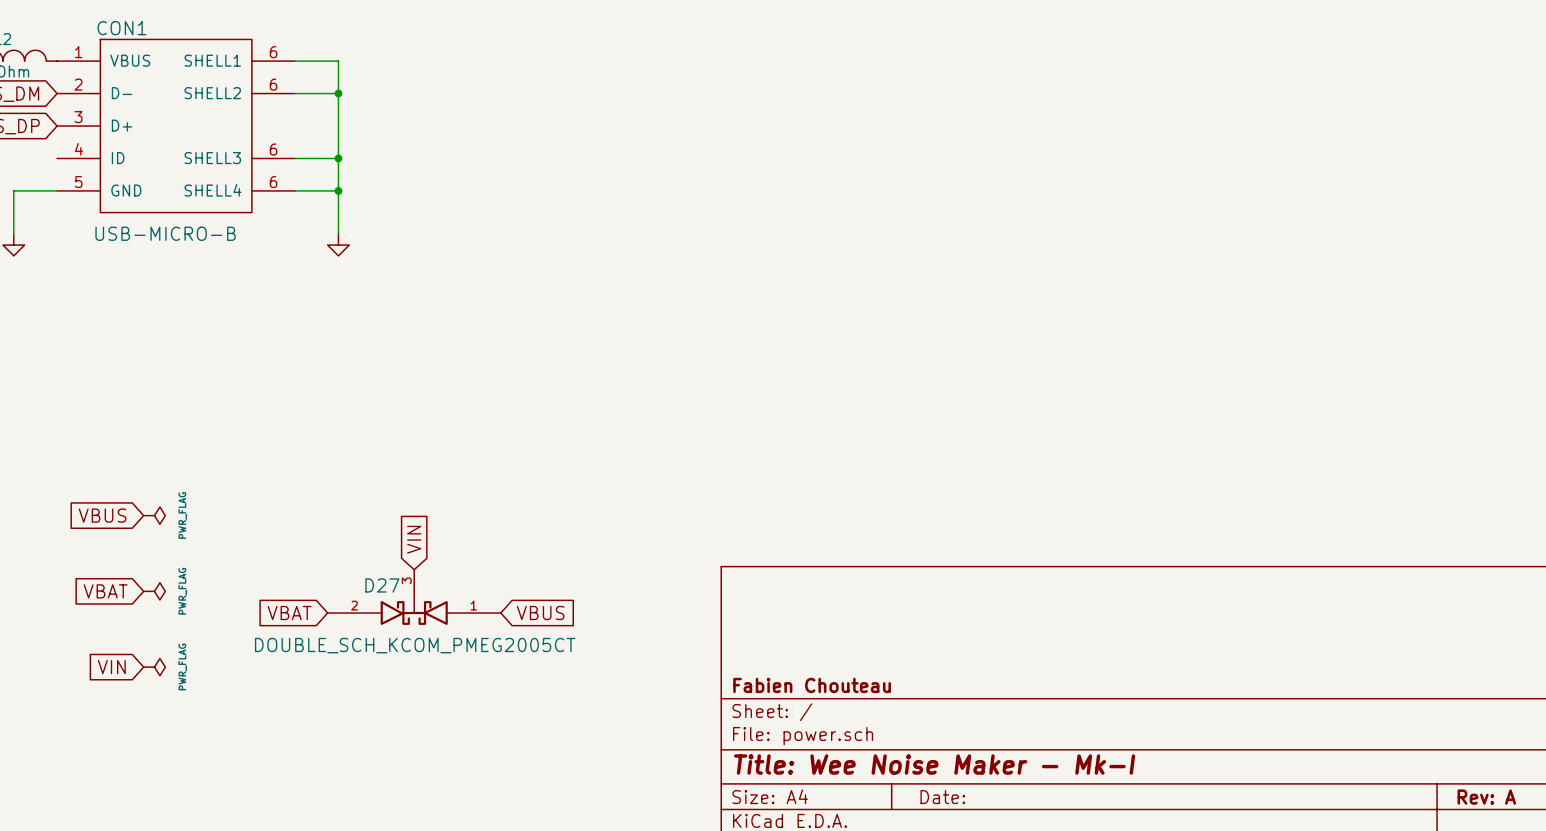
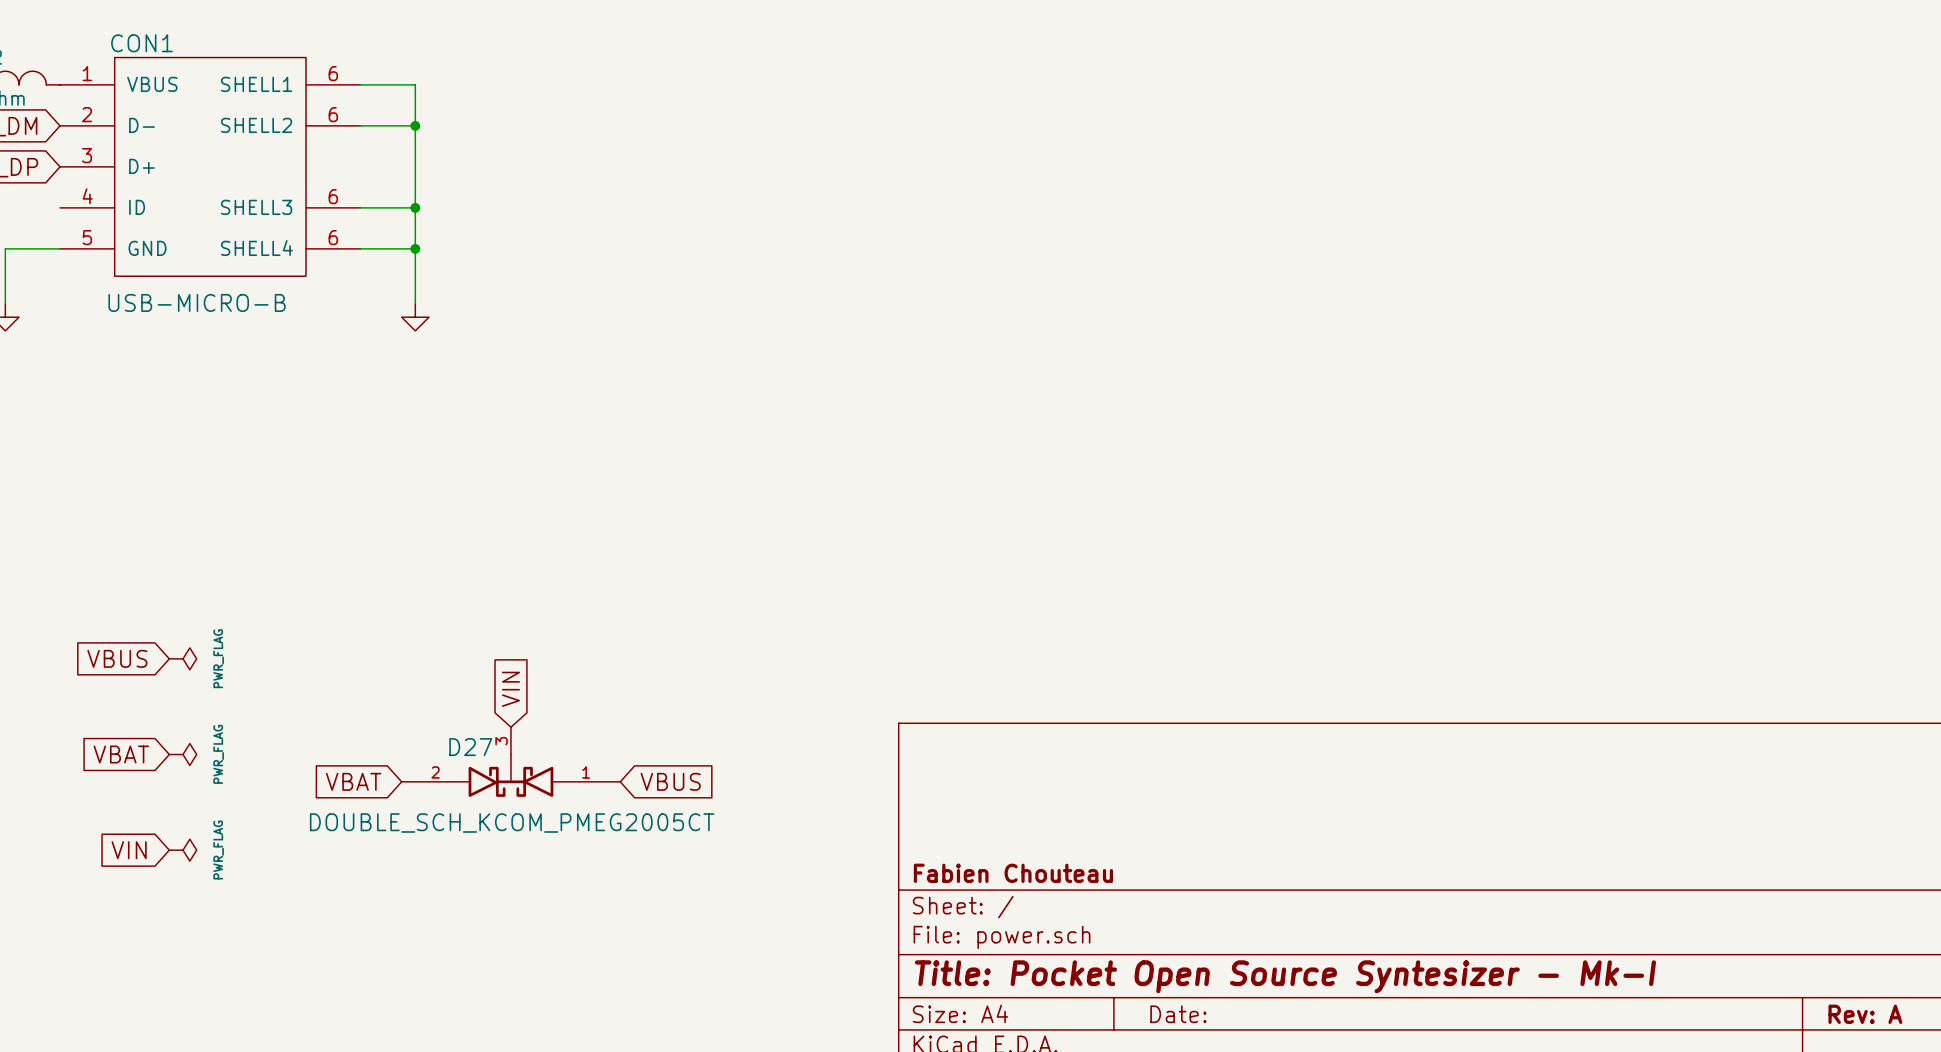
title block: Title: Wee Noise Maker - Mk-I (934, 764) -> Title: Pocket Open Source Syntesizer - Mk-I (1285, 976)

